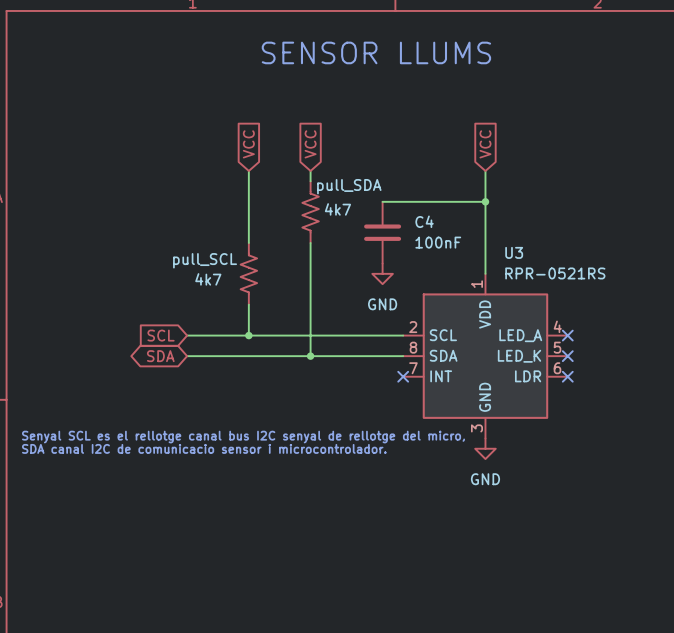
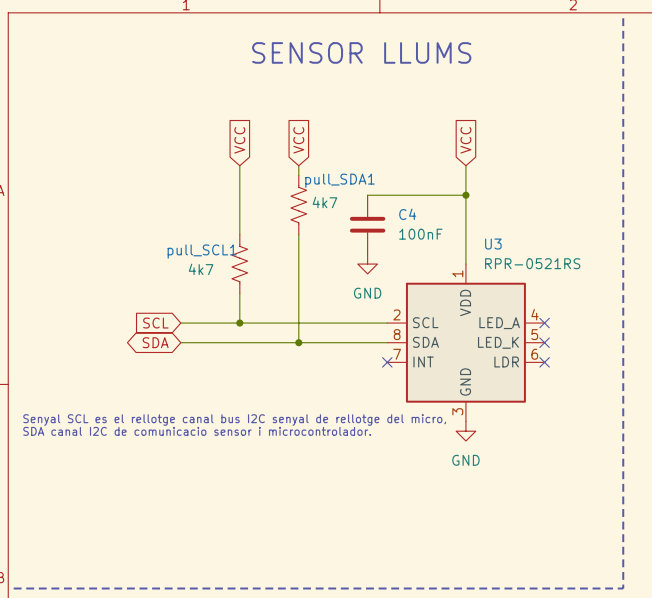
line: none -> (623, 18) (623, 588) (13, 588)
pull_SDA name: pull_SDA (349, 186) -> pull_SDA1 (340, 180)
pull_SCL name: pull_SCL (205, 260) -> pull_SCL1 (202, 251)

